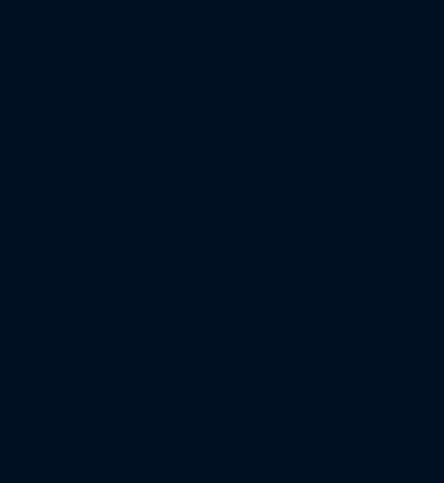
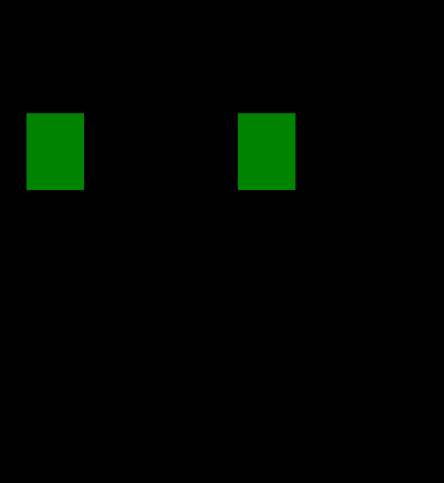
part: none -> (160, 151)

